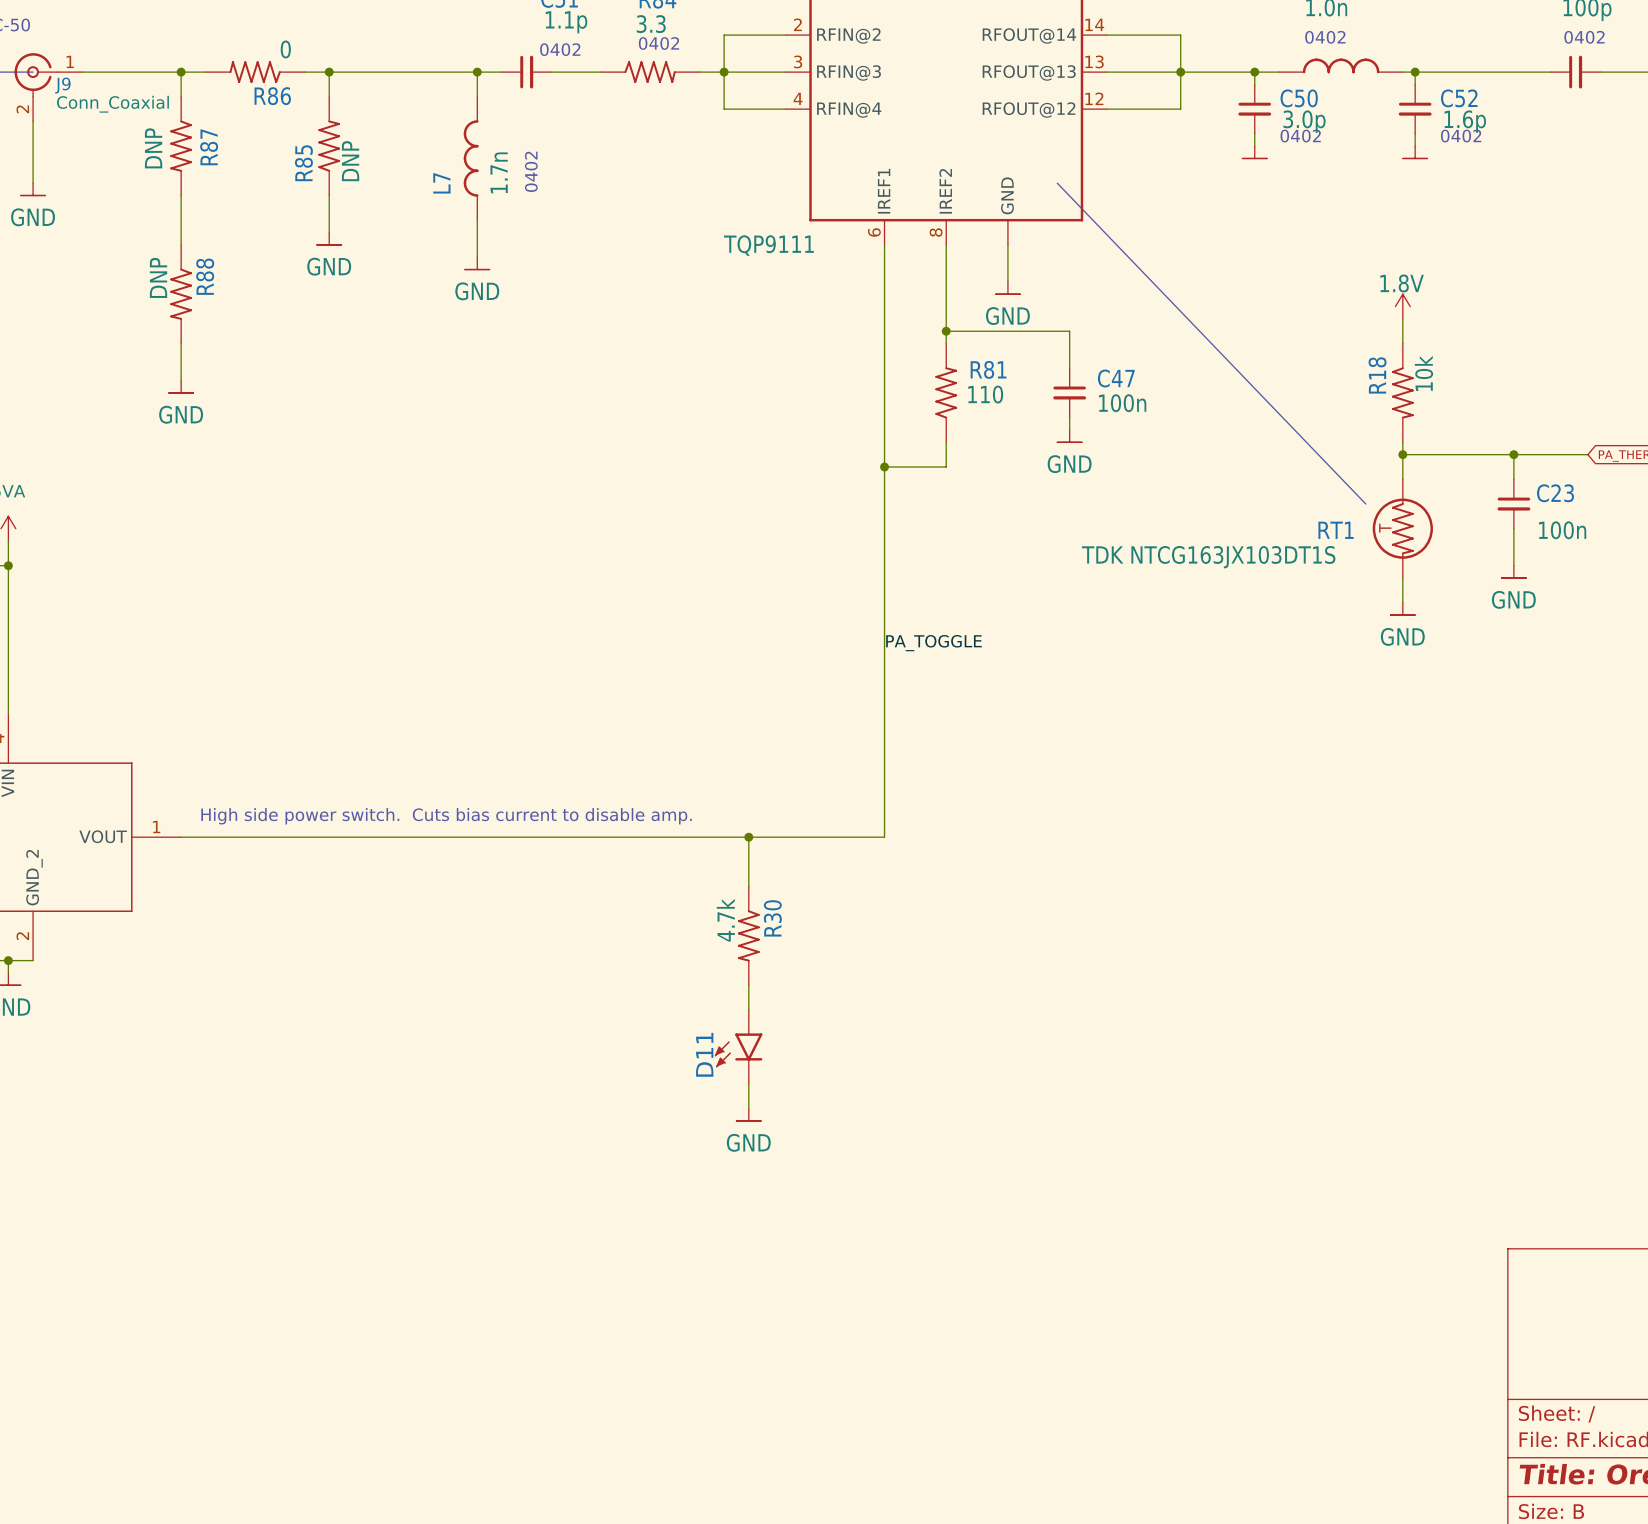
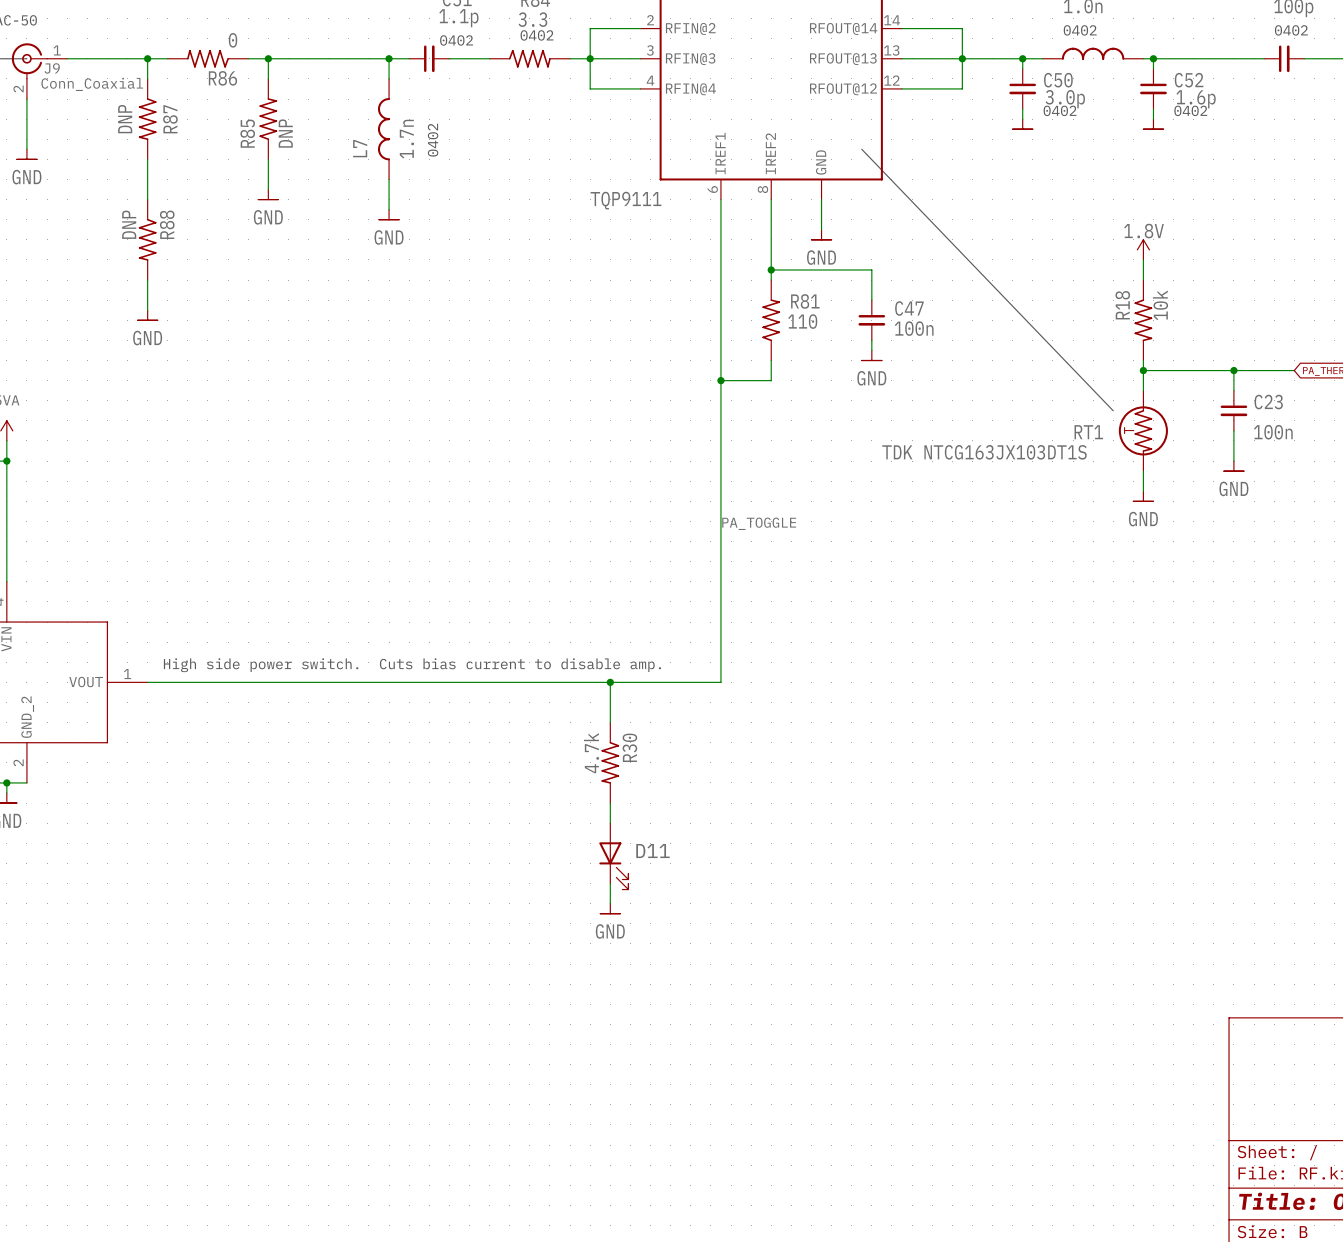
D11 symbol: [714, 1009, 763, 1085] -> [599, 823, 629, 890]
D11 name position: D11 (704, 1054) -> D11 (653, 851)

